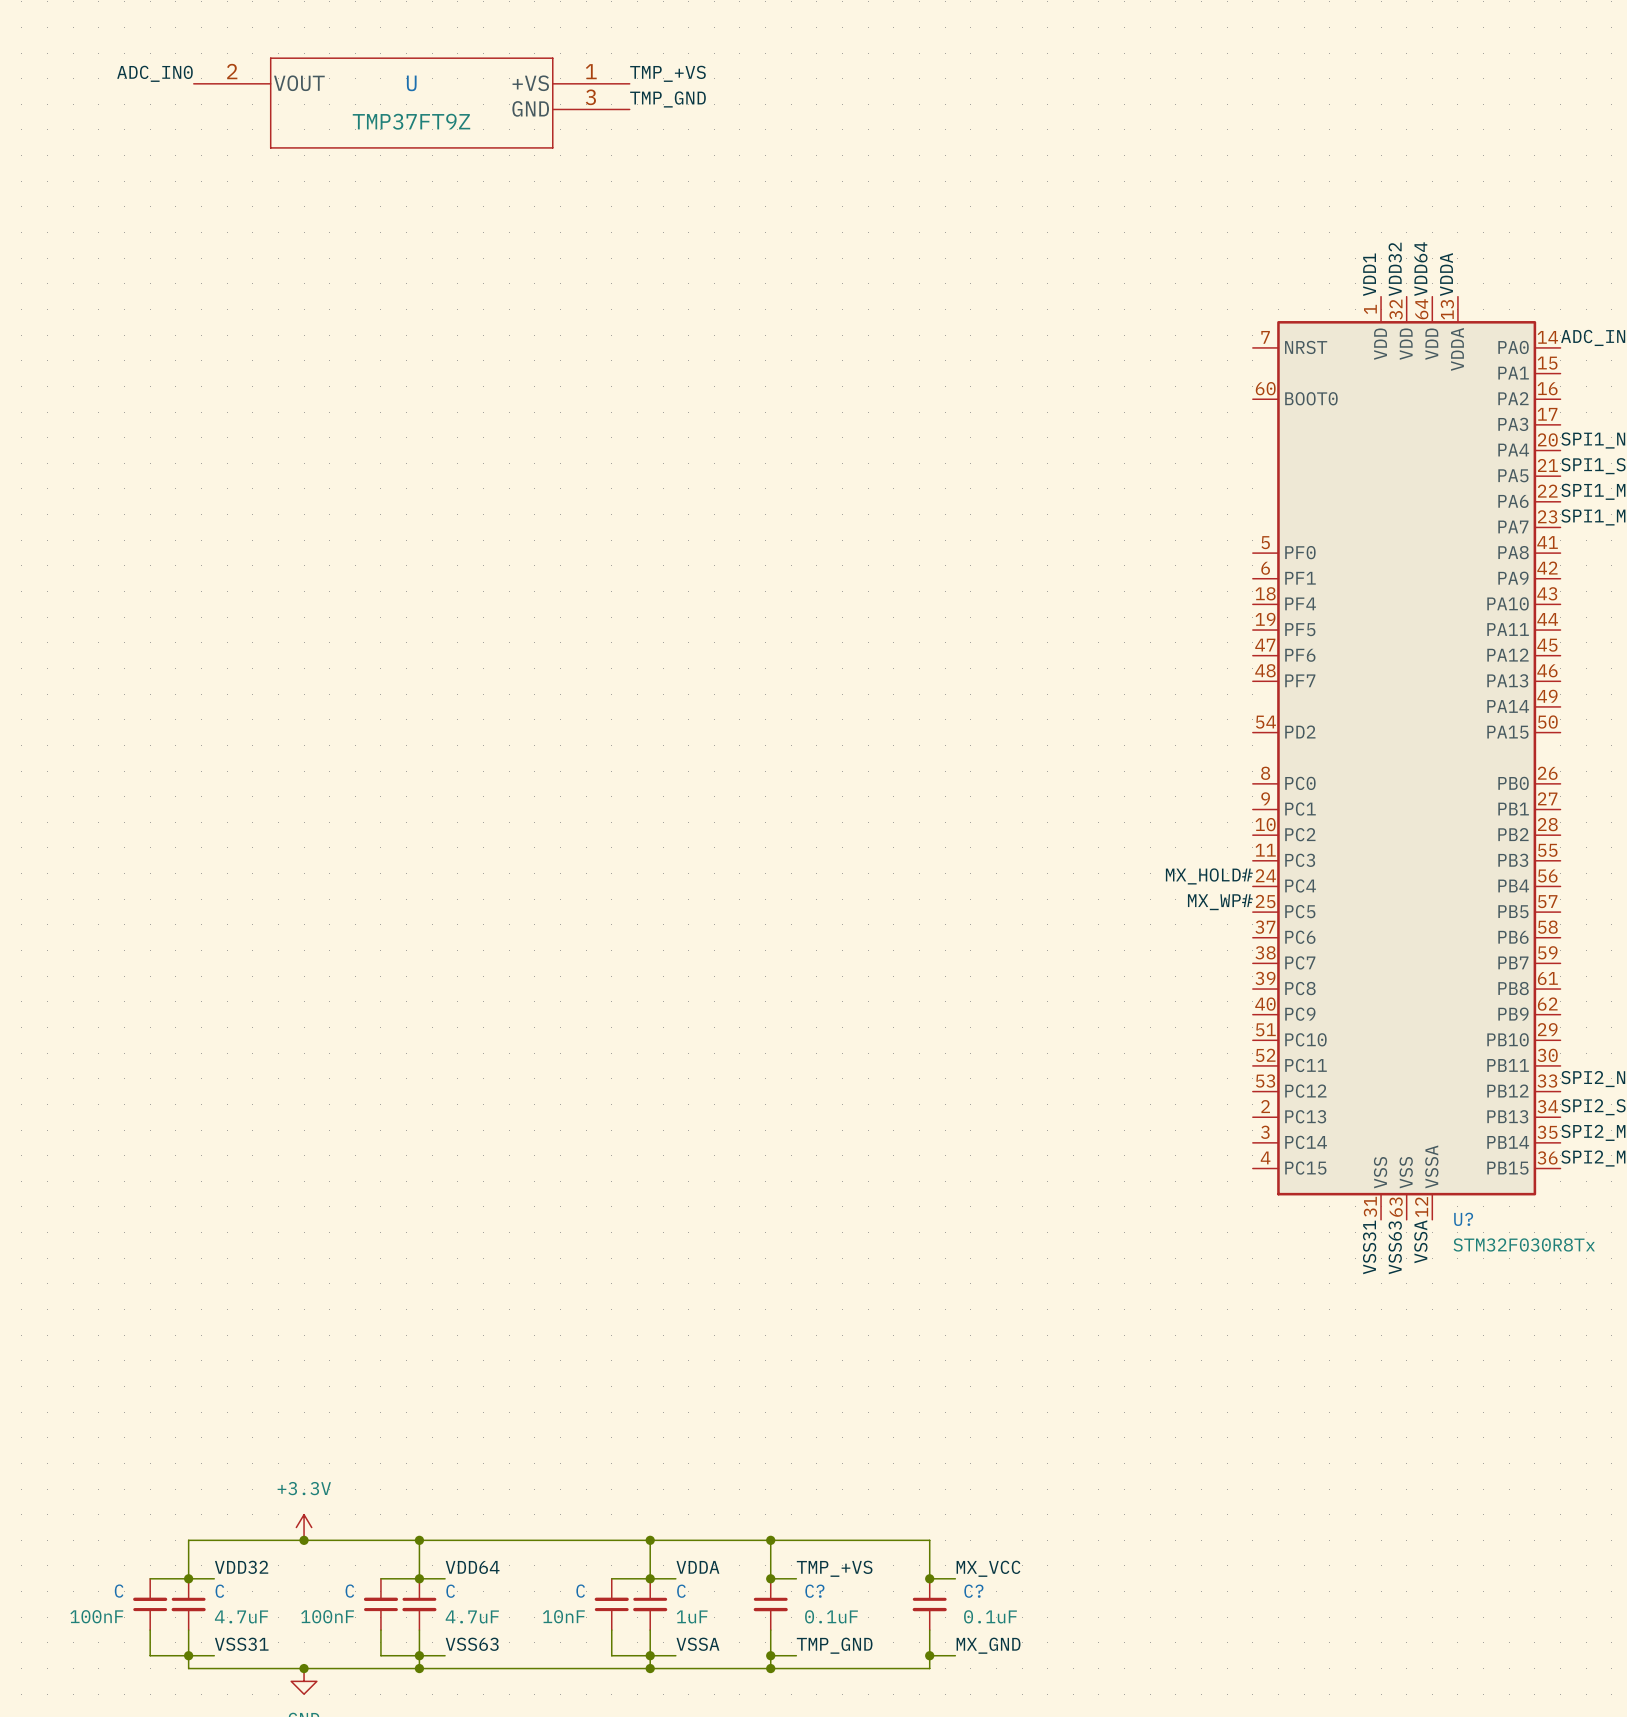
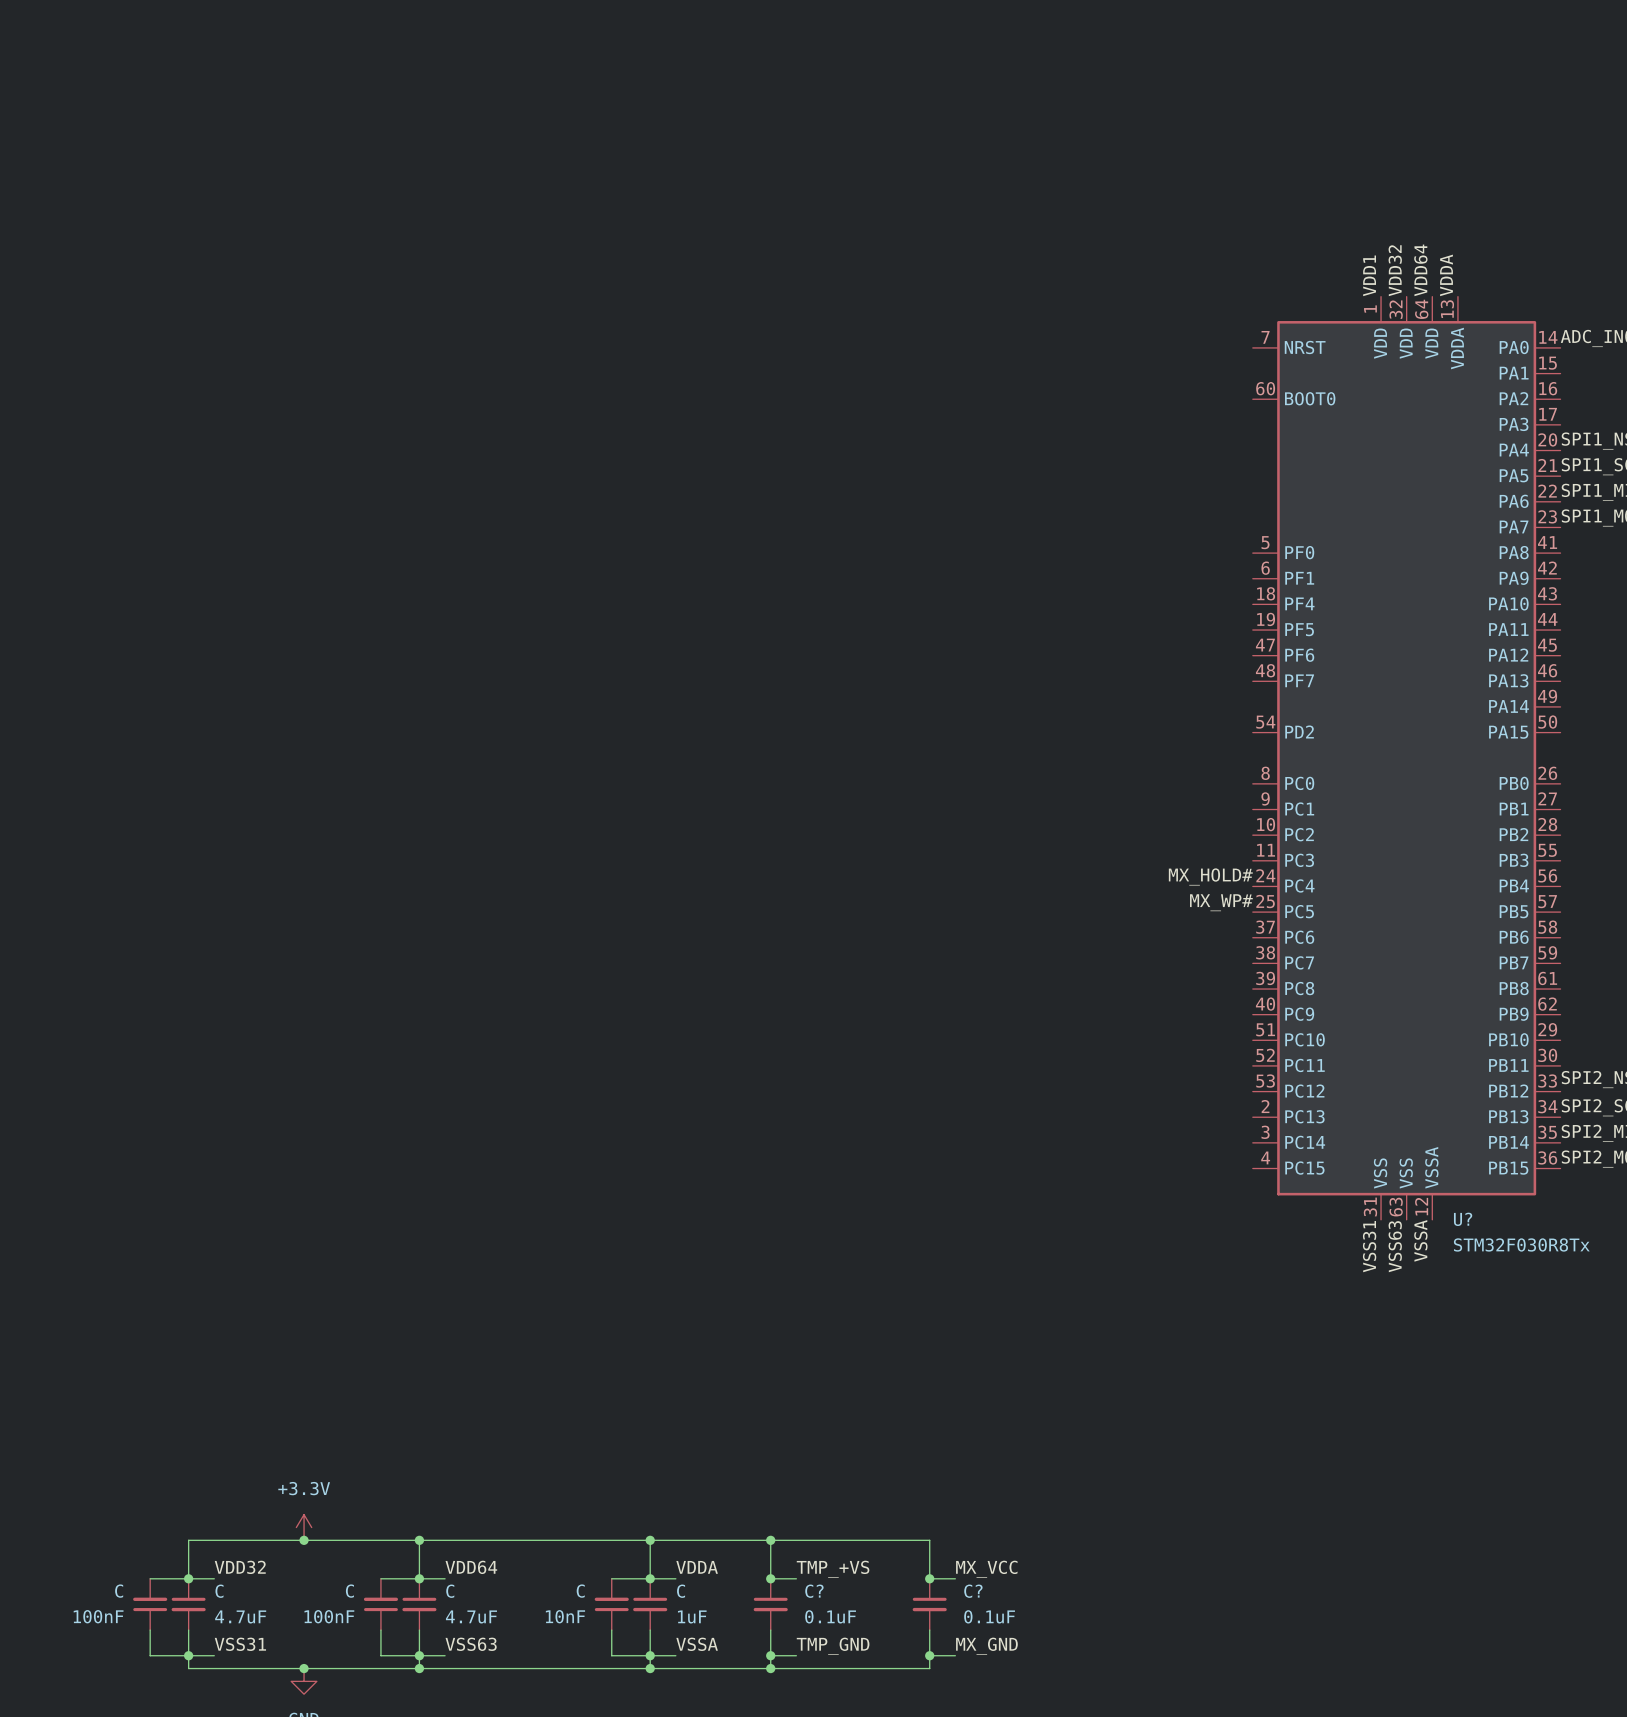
label: ADC_IN0 (154, 73) -> none
label: TMP_+VS (667, 73) -> none
label: TMP_GND (667, 99) -> none
U: TMP37FT9Z (411, 103) -> none

